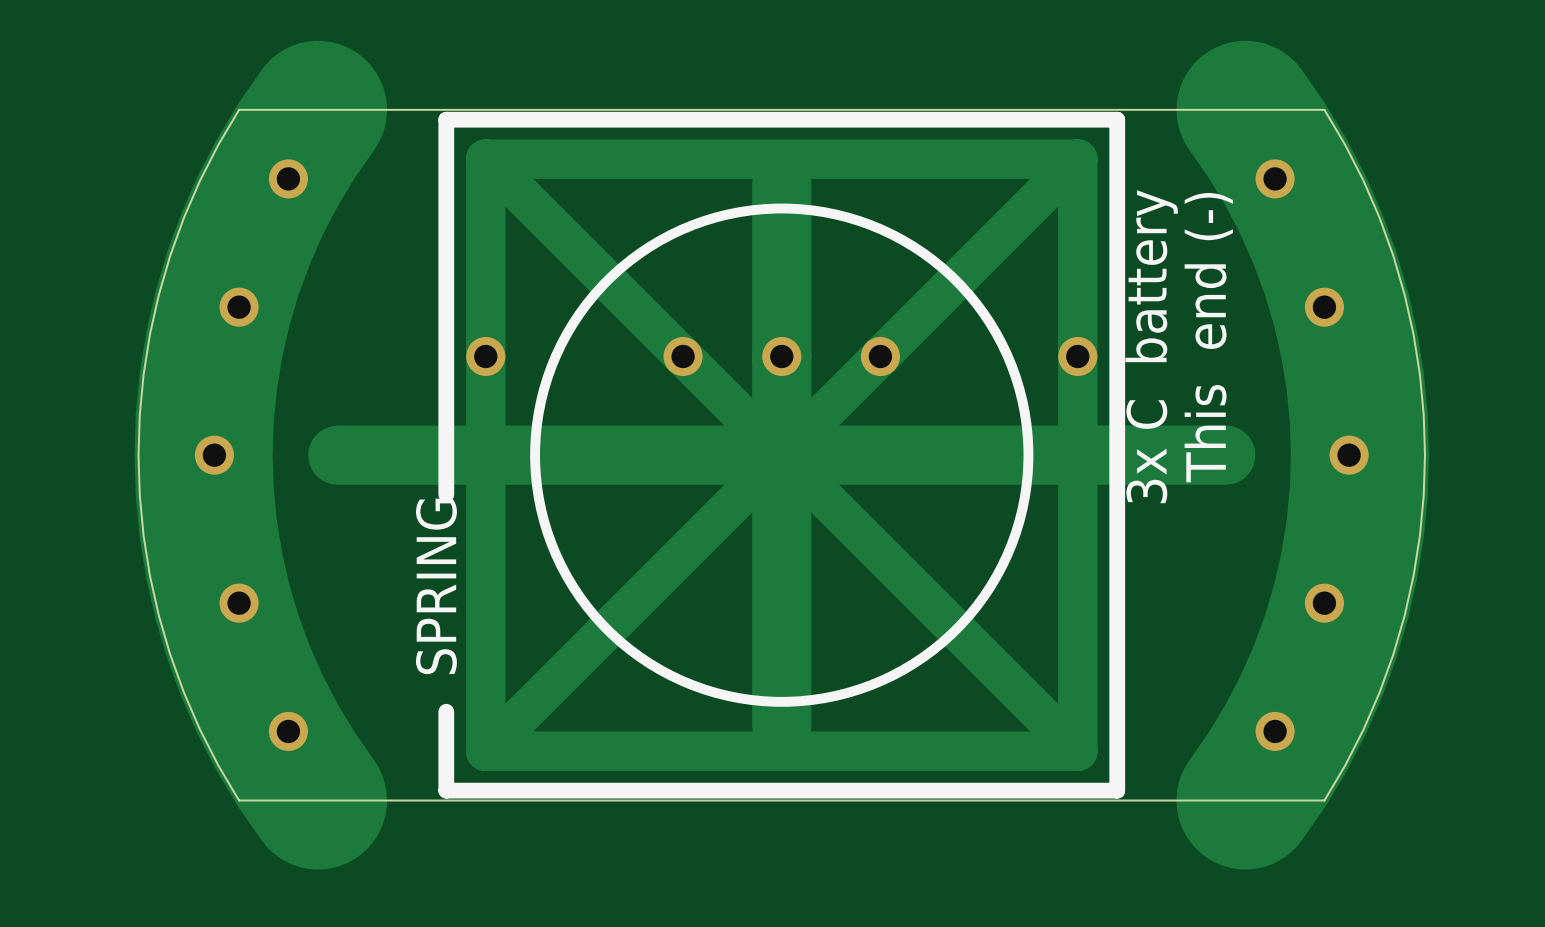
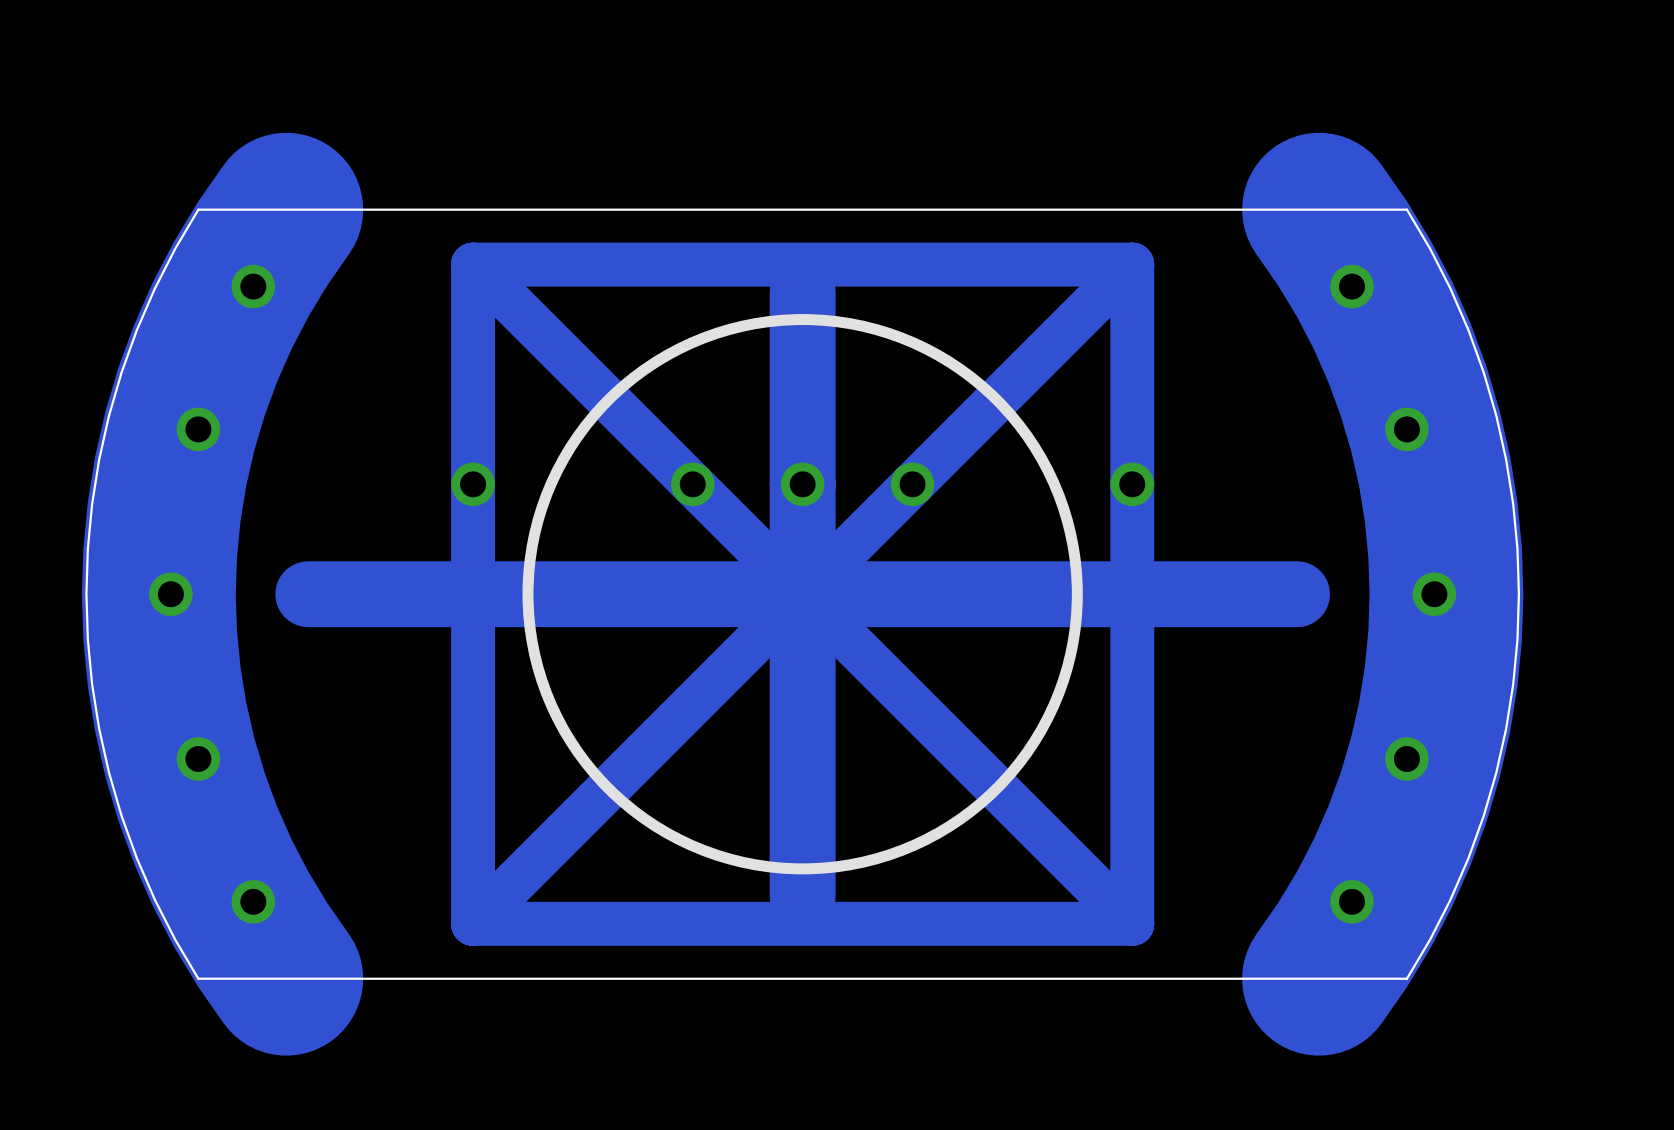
text: This end (-) (1208, 337) -> none
text: 3x C battery (1151, 346) -> none
line: (446, 494) (446, 119) (1117, 119) (1117, 790) (446, 790) (446, 711) -> none
text: SPRING (436, 586) -> none

